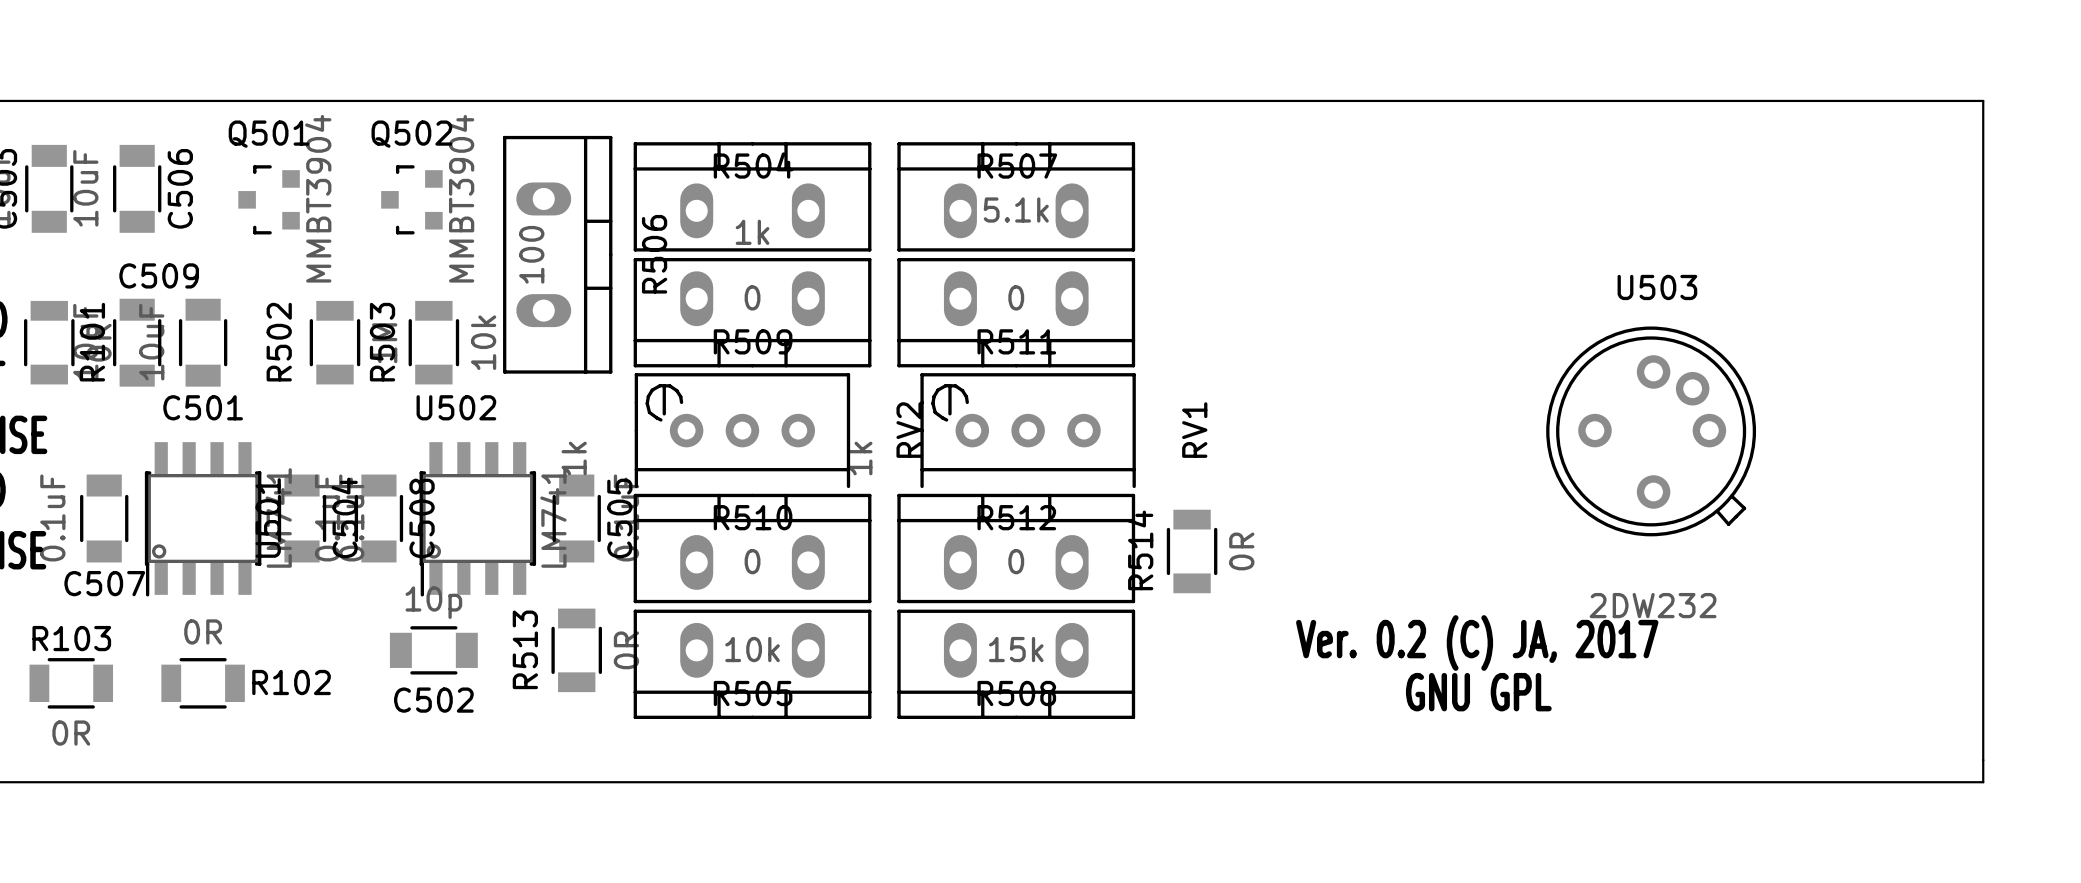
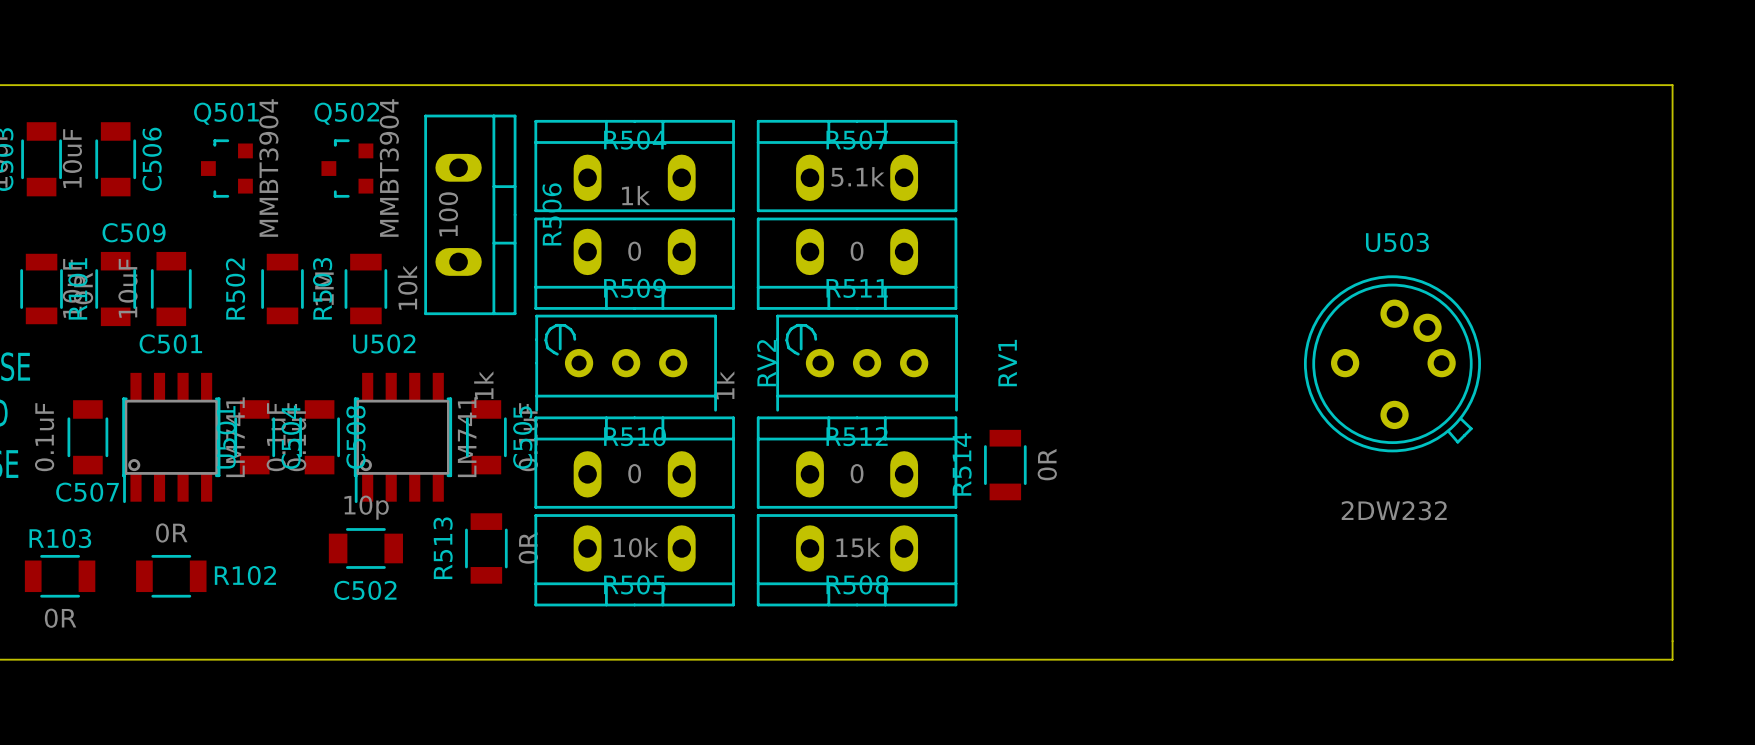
text: Ver. 0.2 (C) JA, 2017 (1477, 643) -> none
text: GNU GPL (1478, 692) -> none

